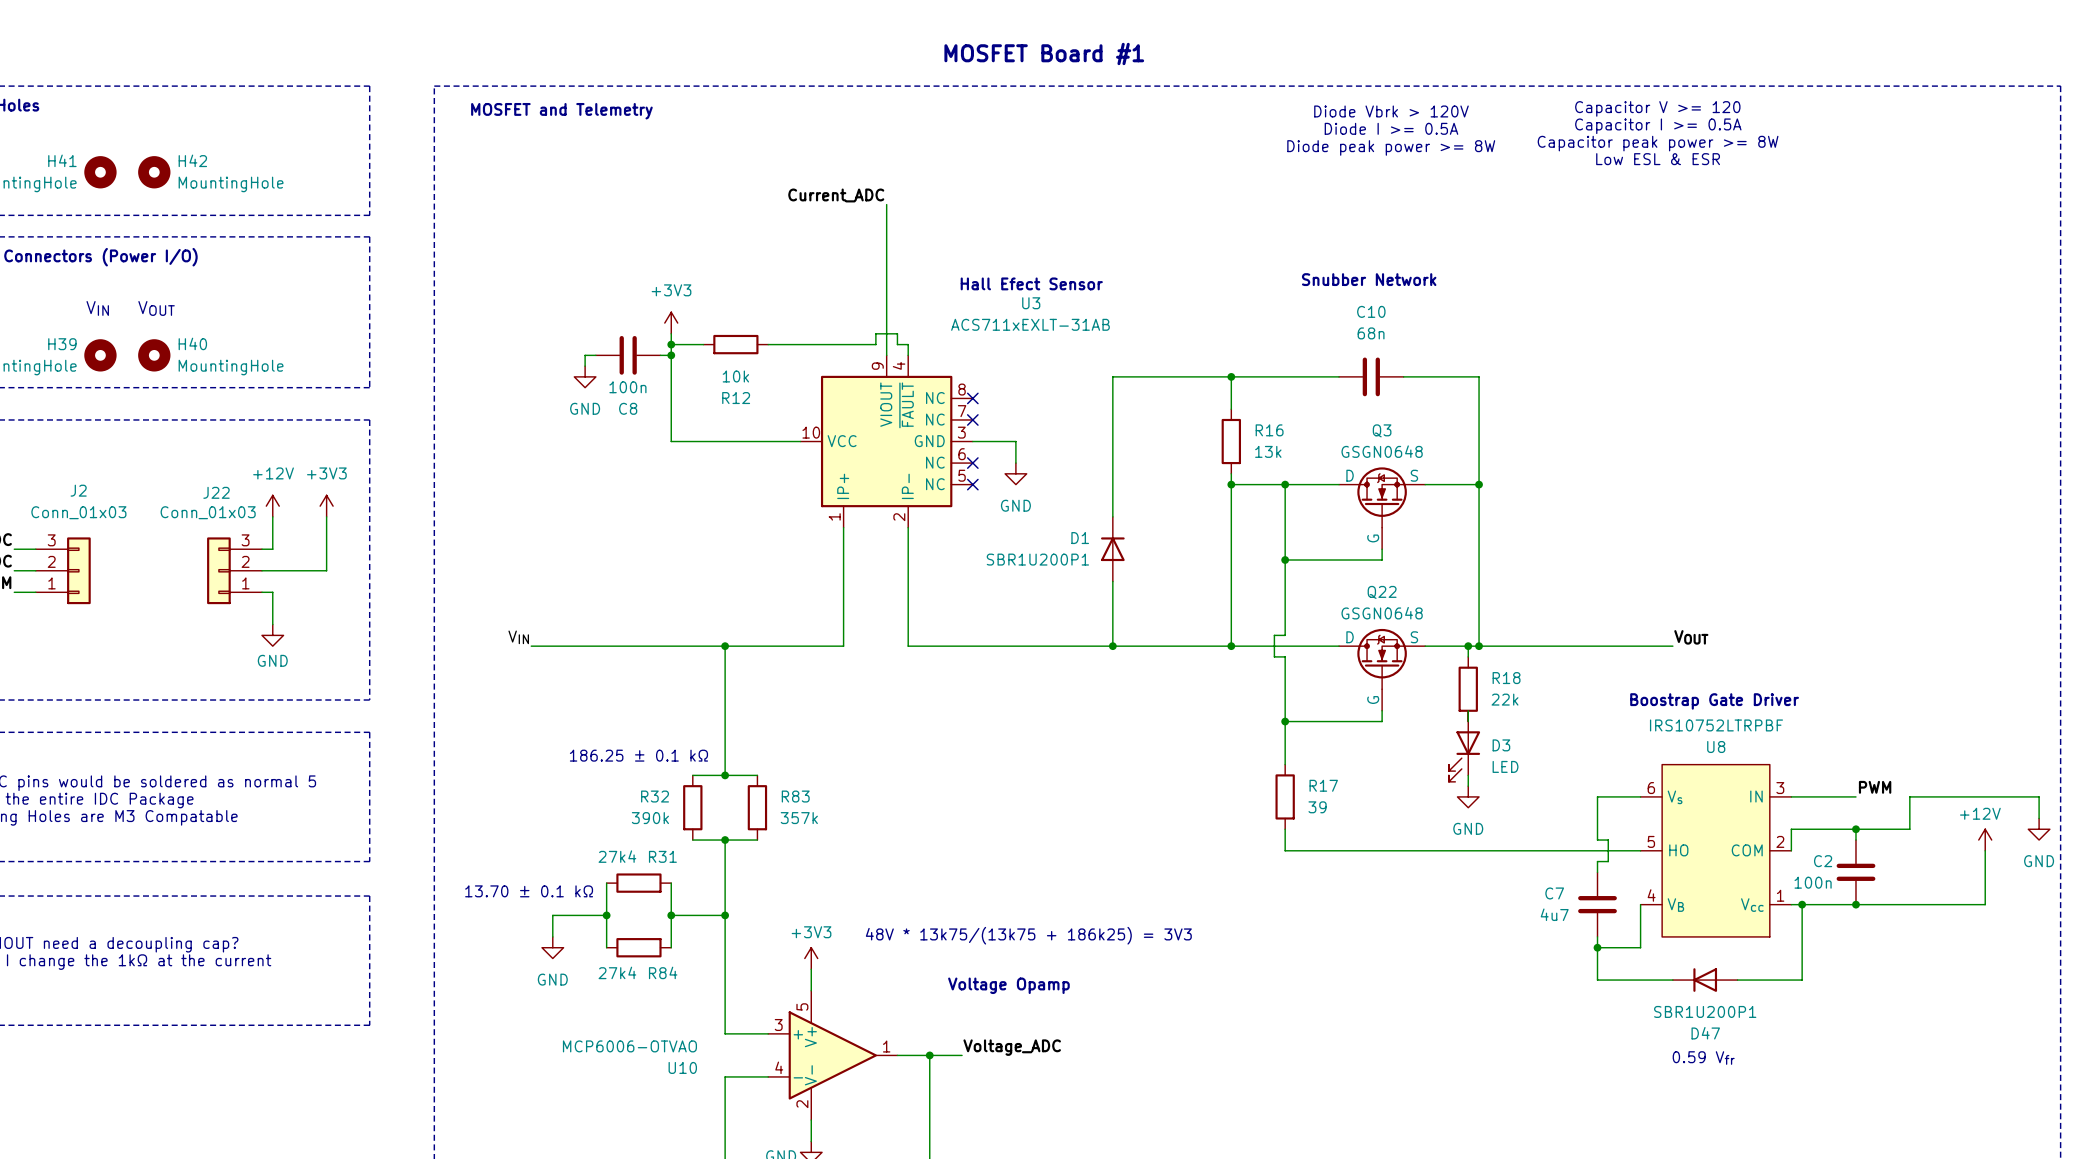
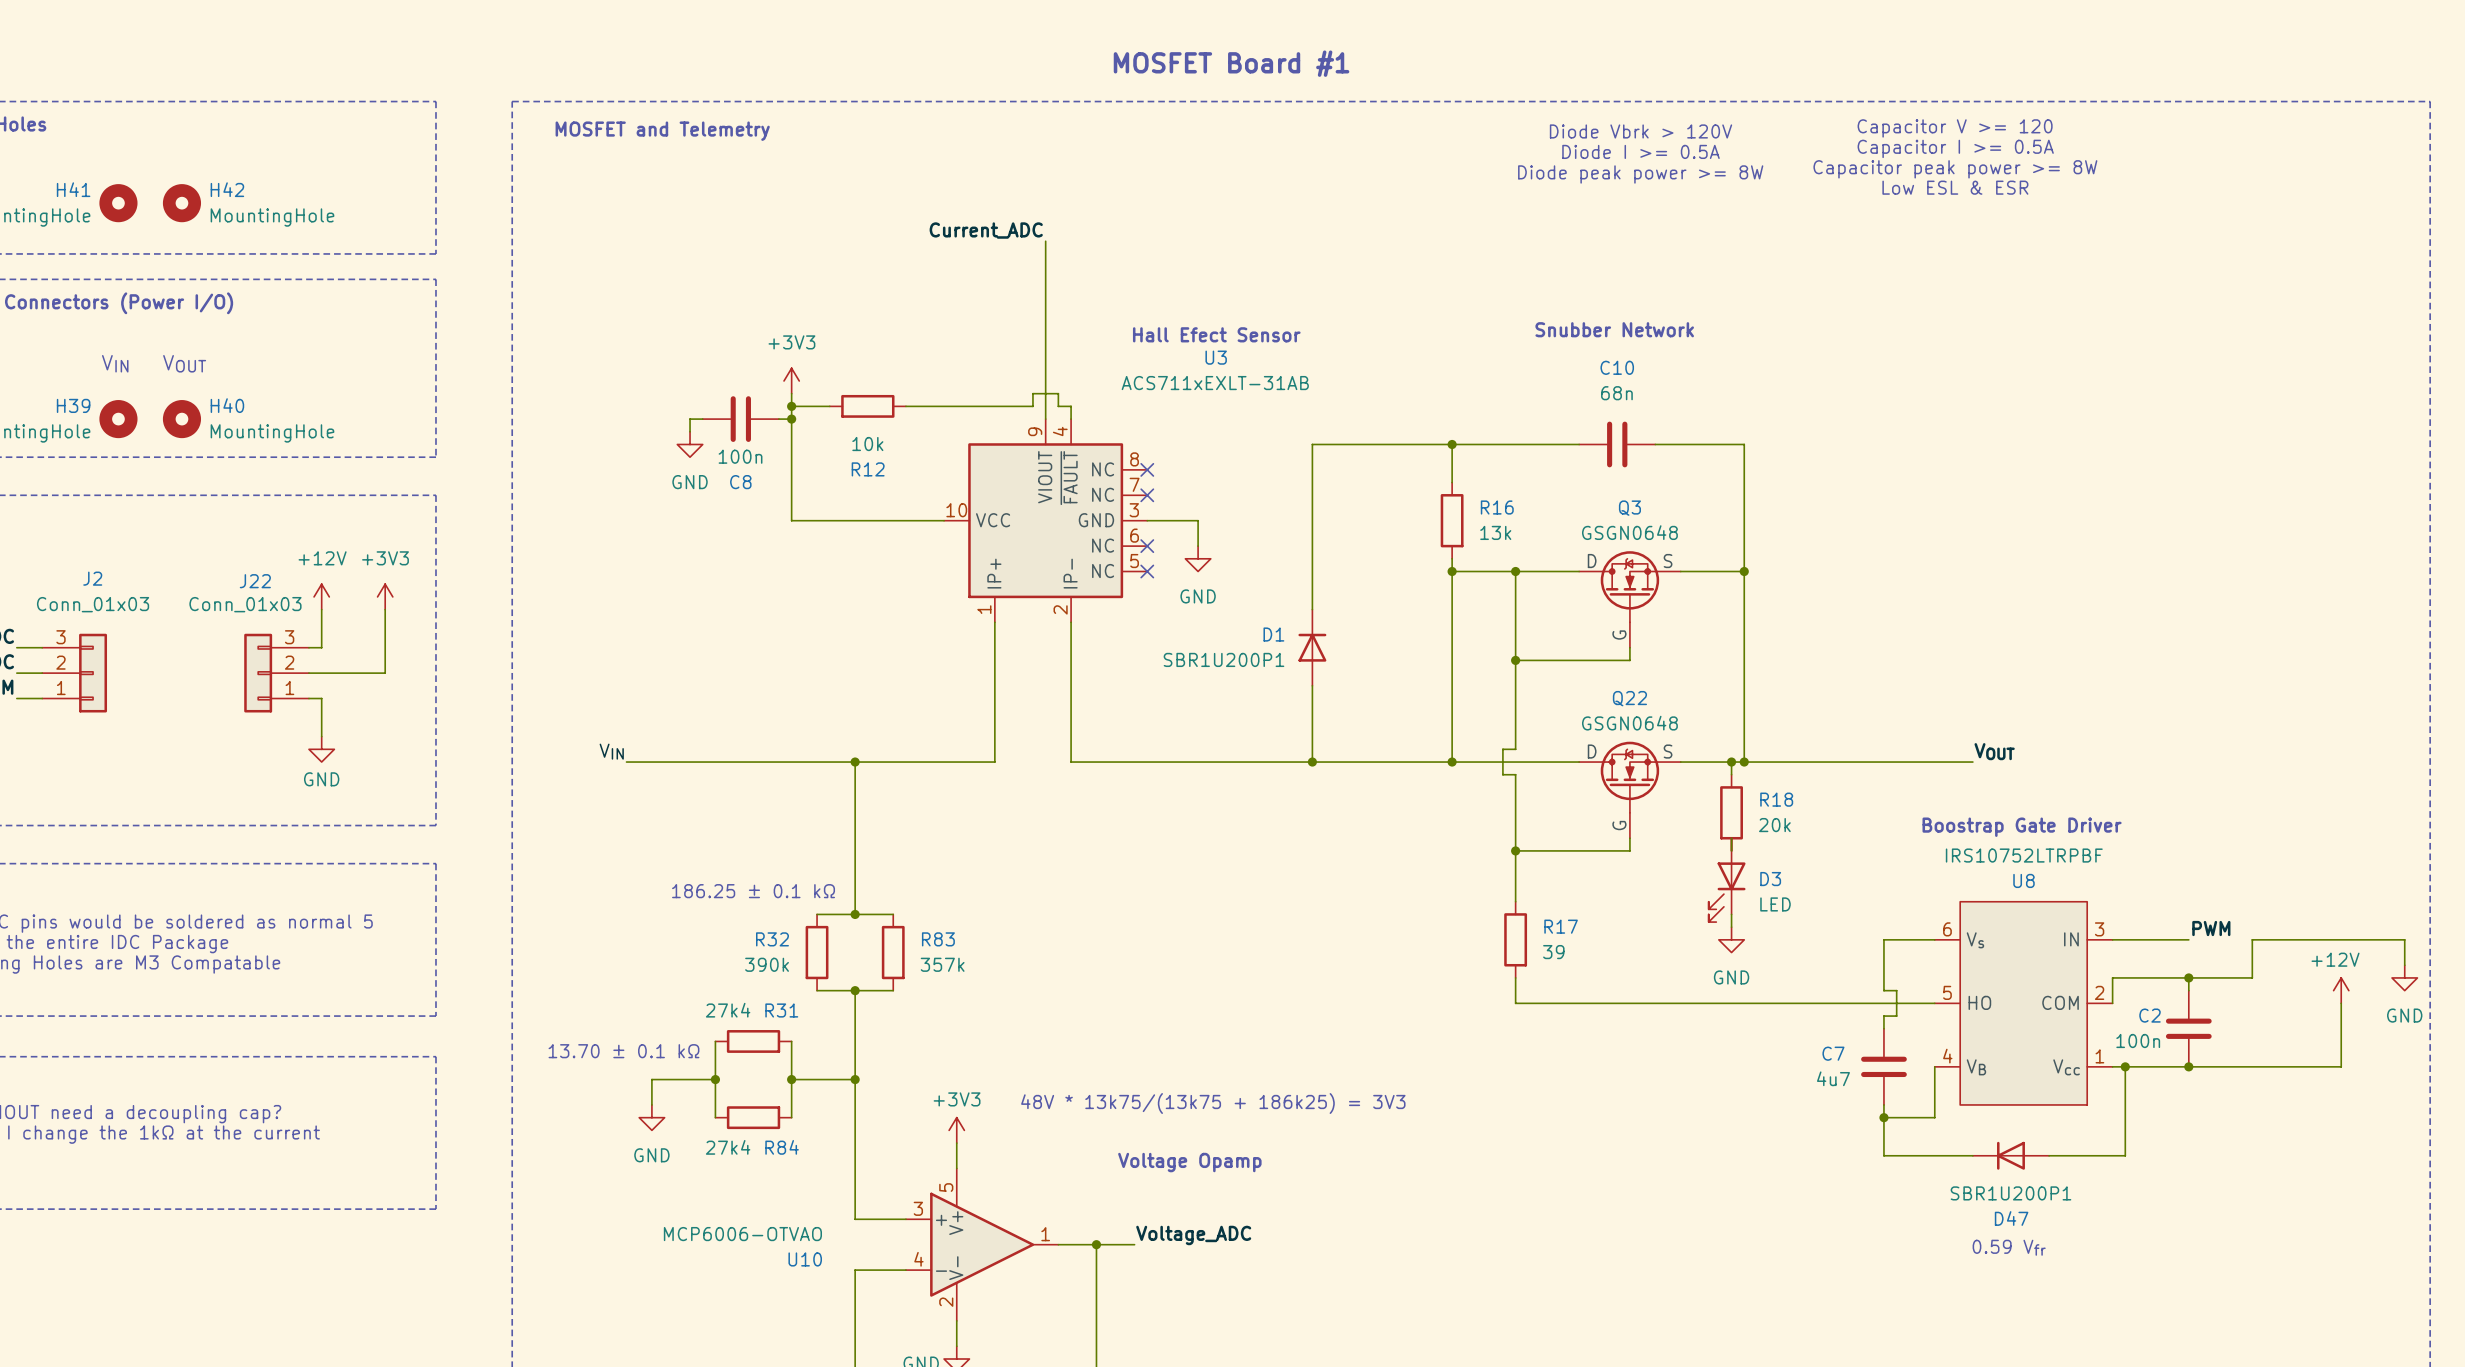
R18 value: 22k (1505, 699) -> 20k (1774, 825)

